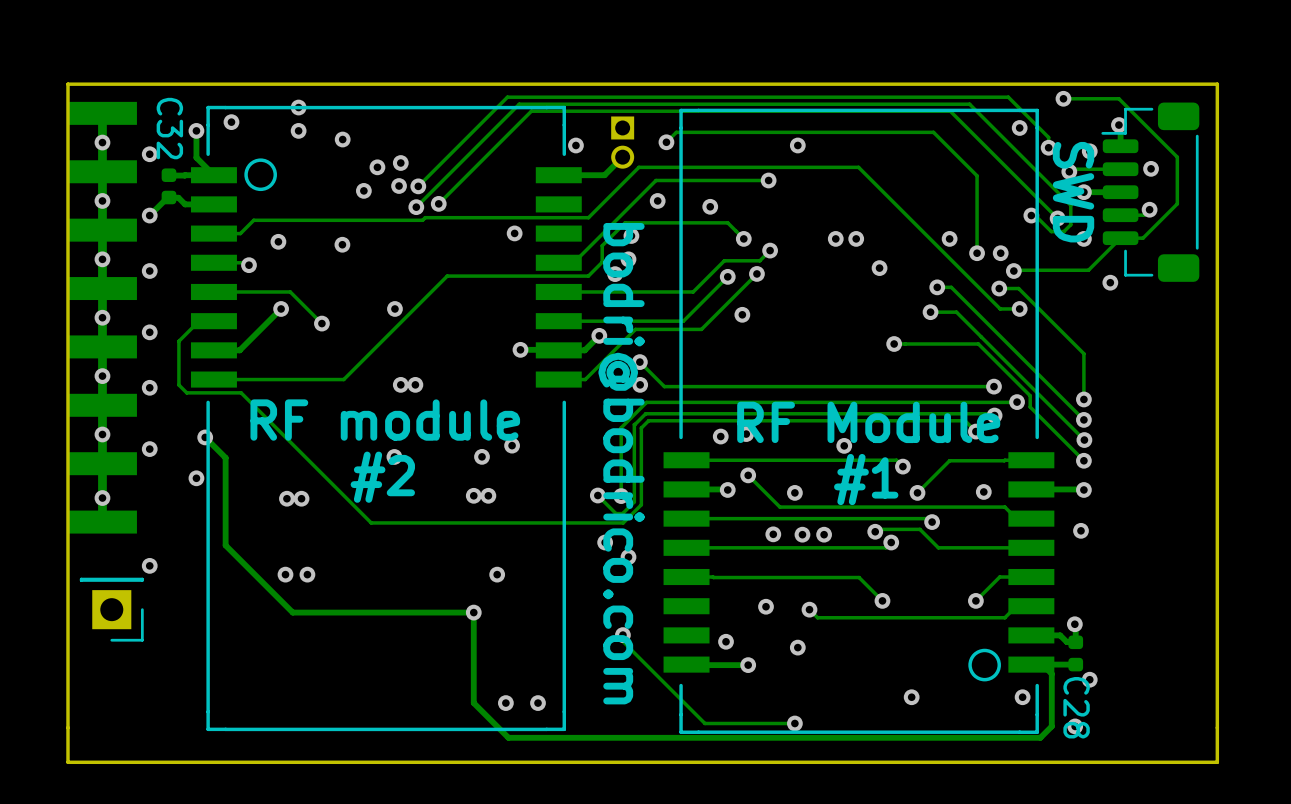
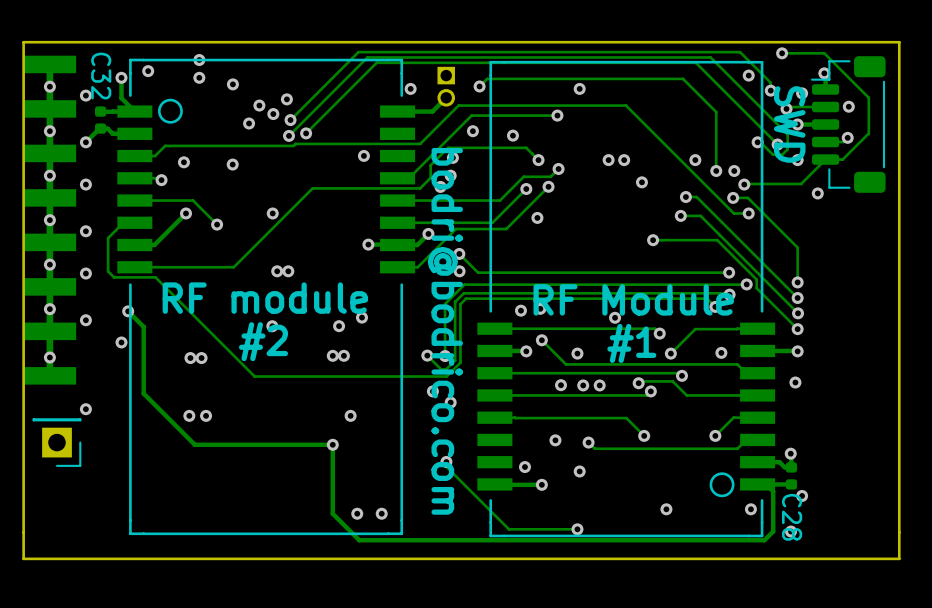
via: none -> (286, 99)
via: (400, 163) -> none
via: none -> (273, 114)
via: (399, 186) -> none

